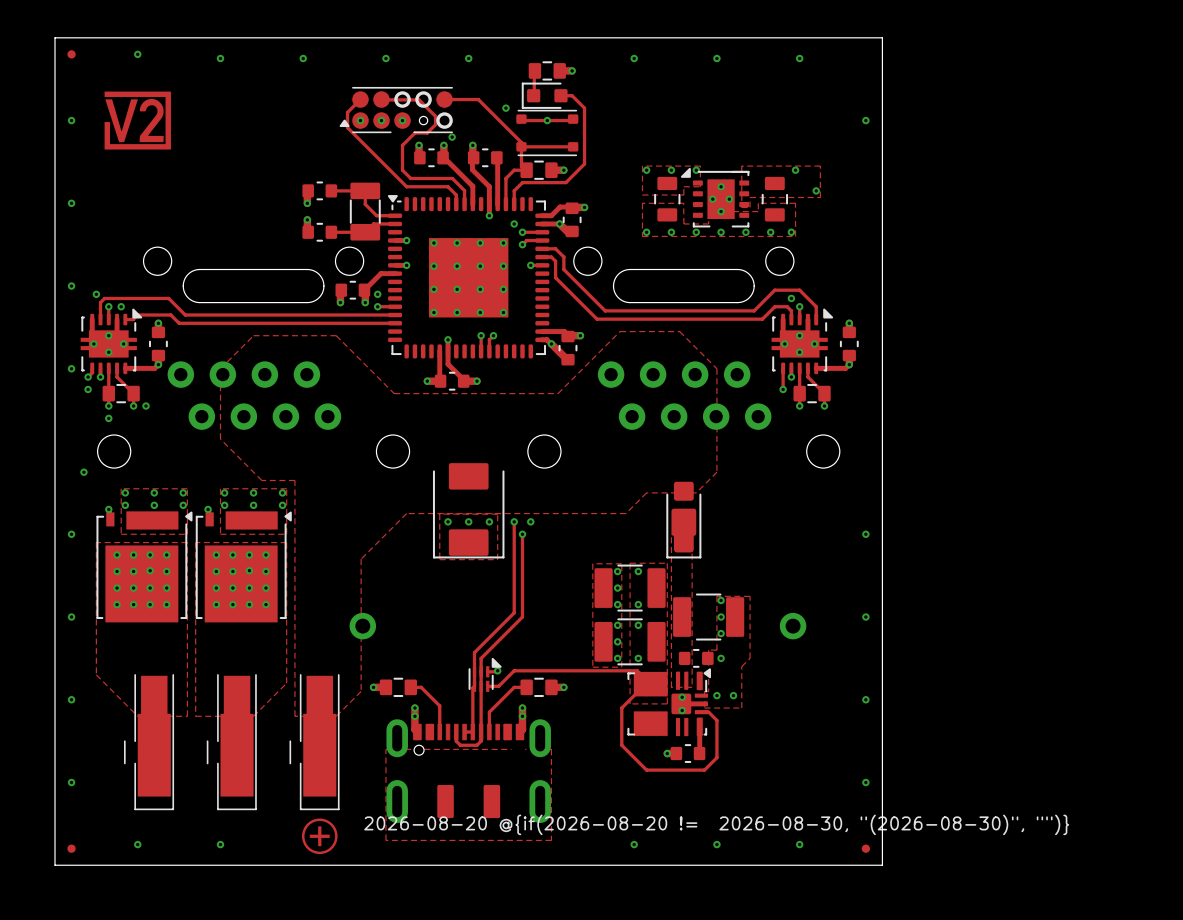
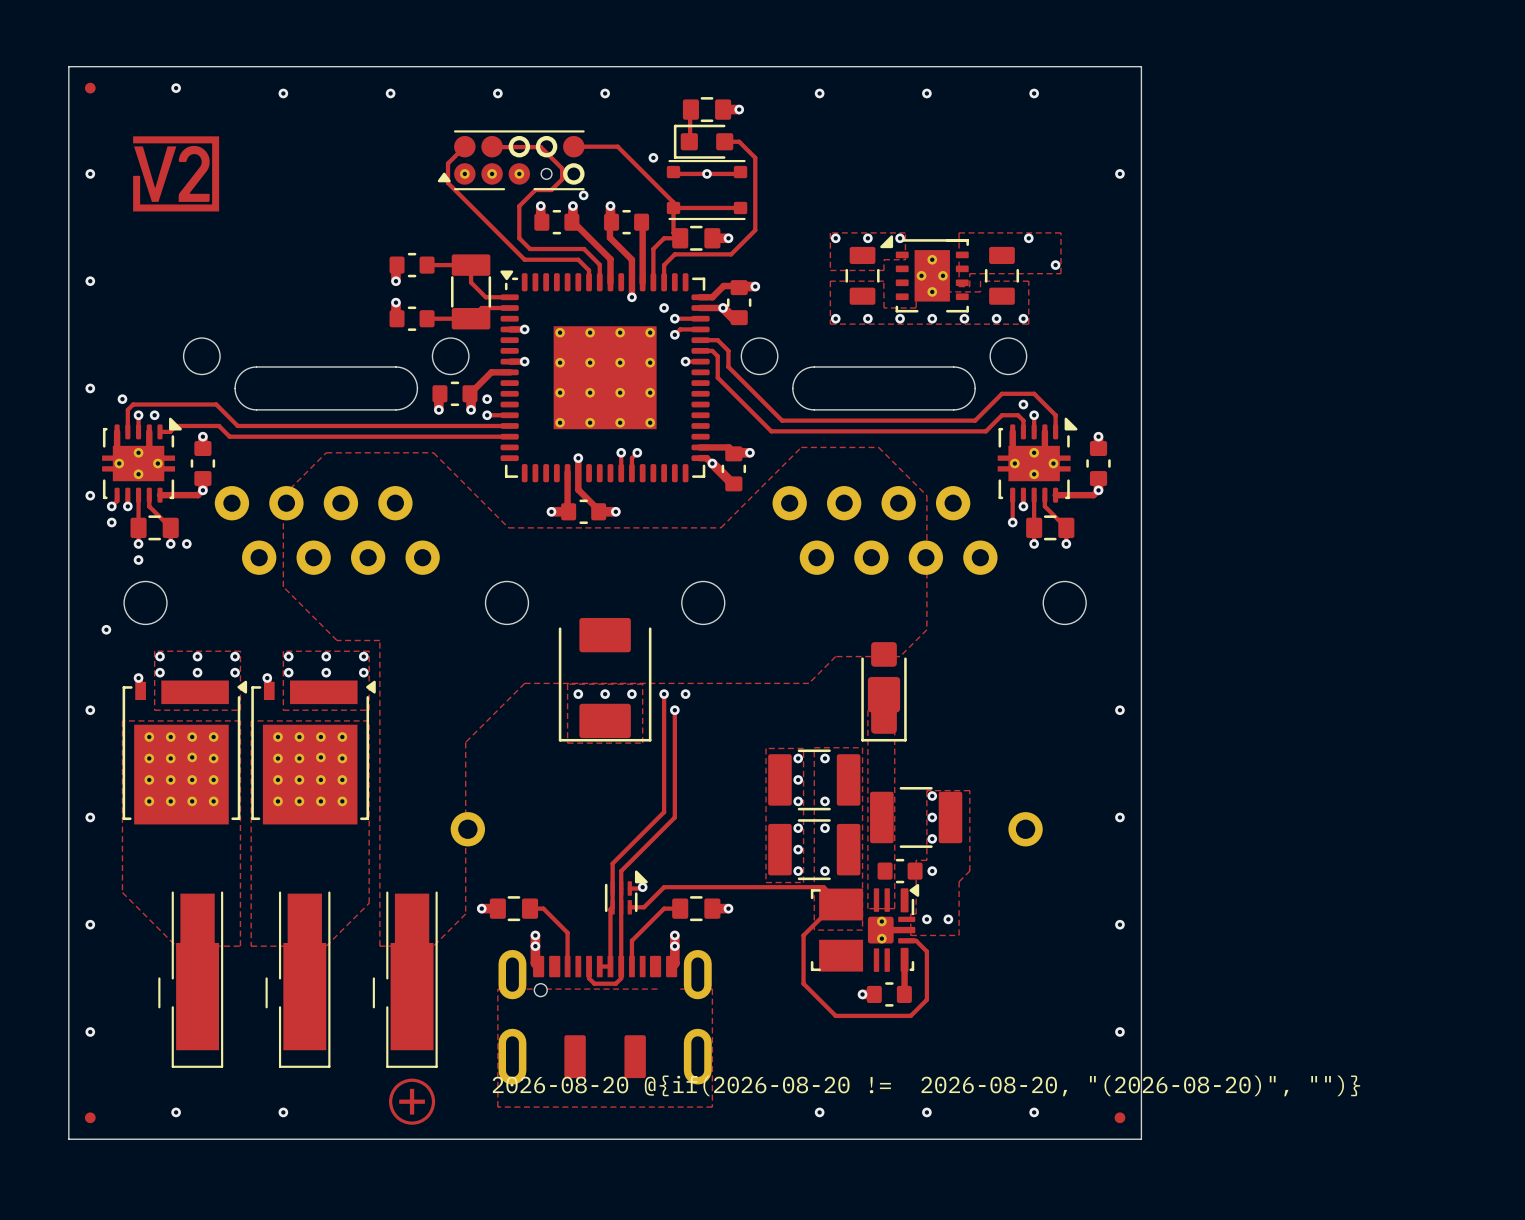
drawing shape: [364, 814, 1070, 836] -> [492, 1075, 1361, 1097]

